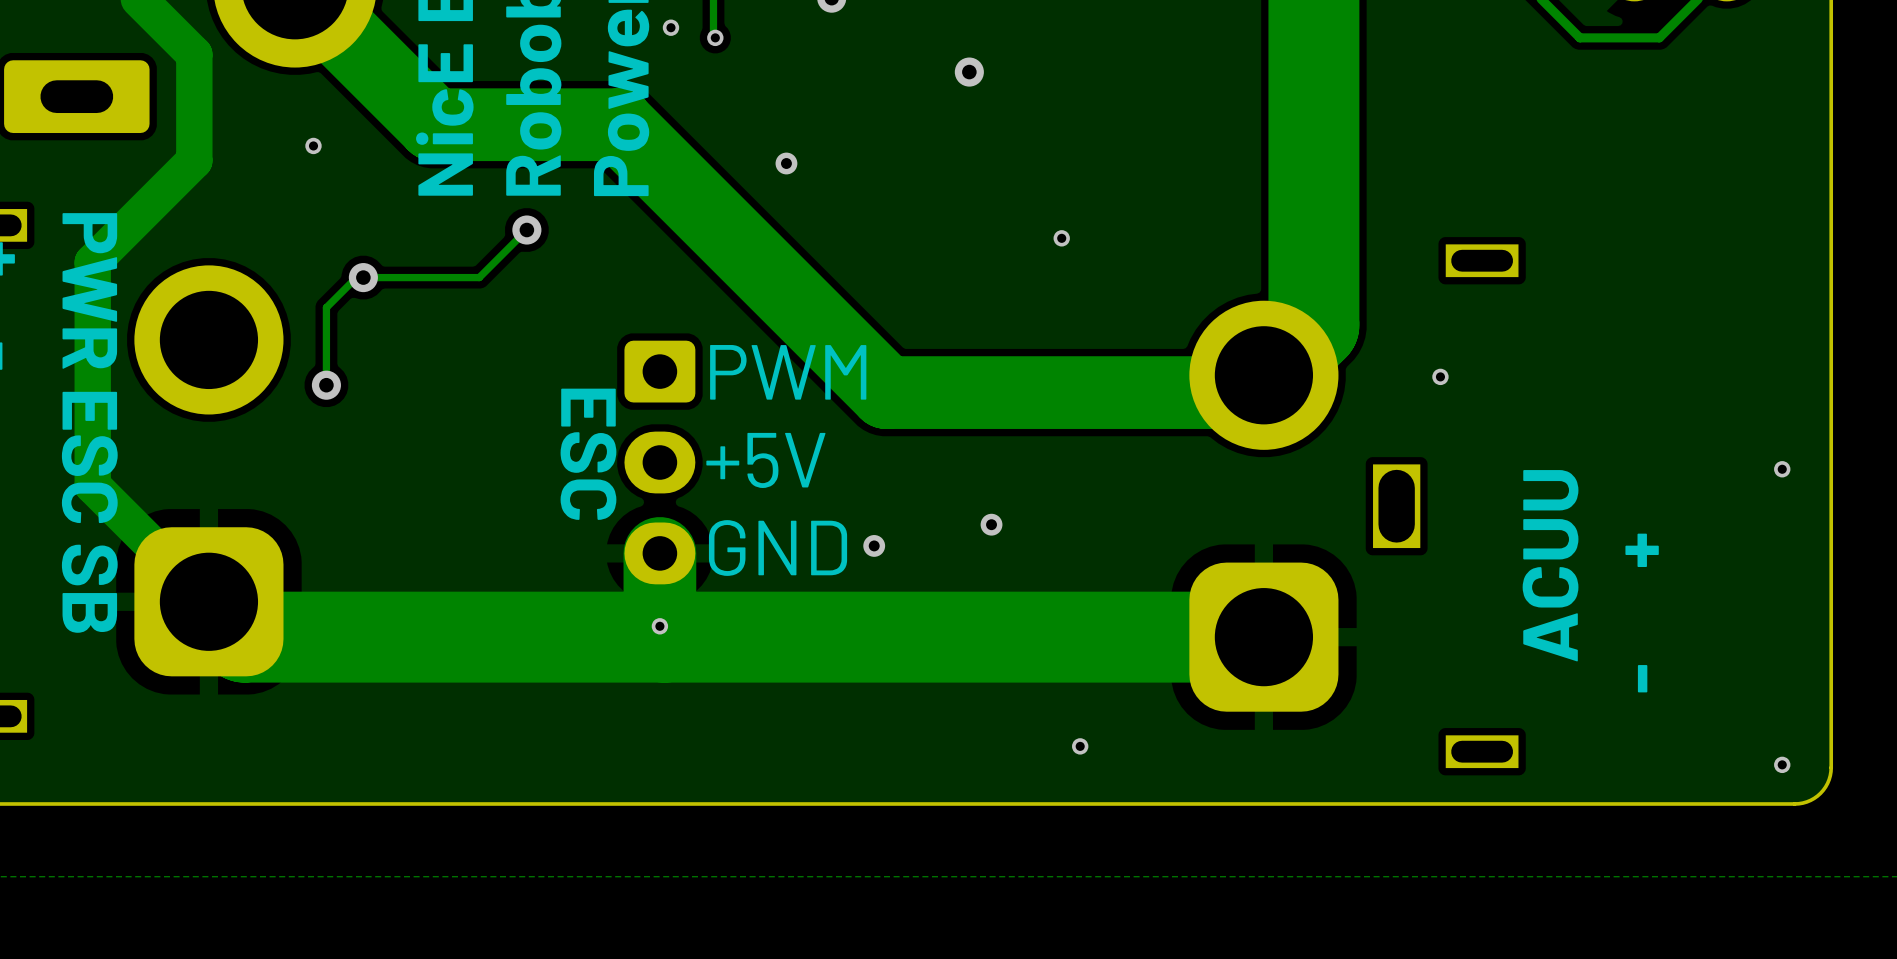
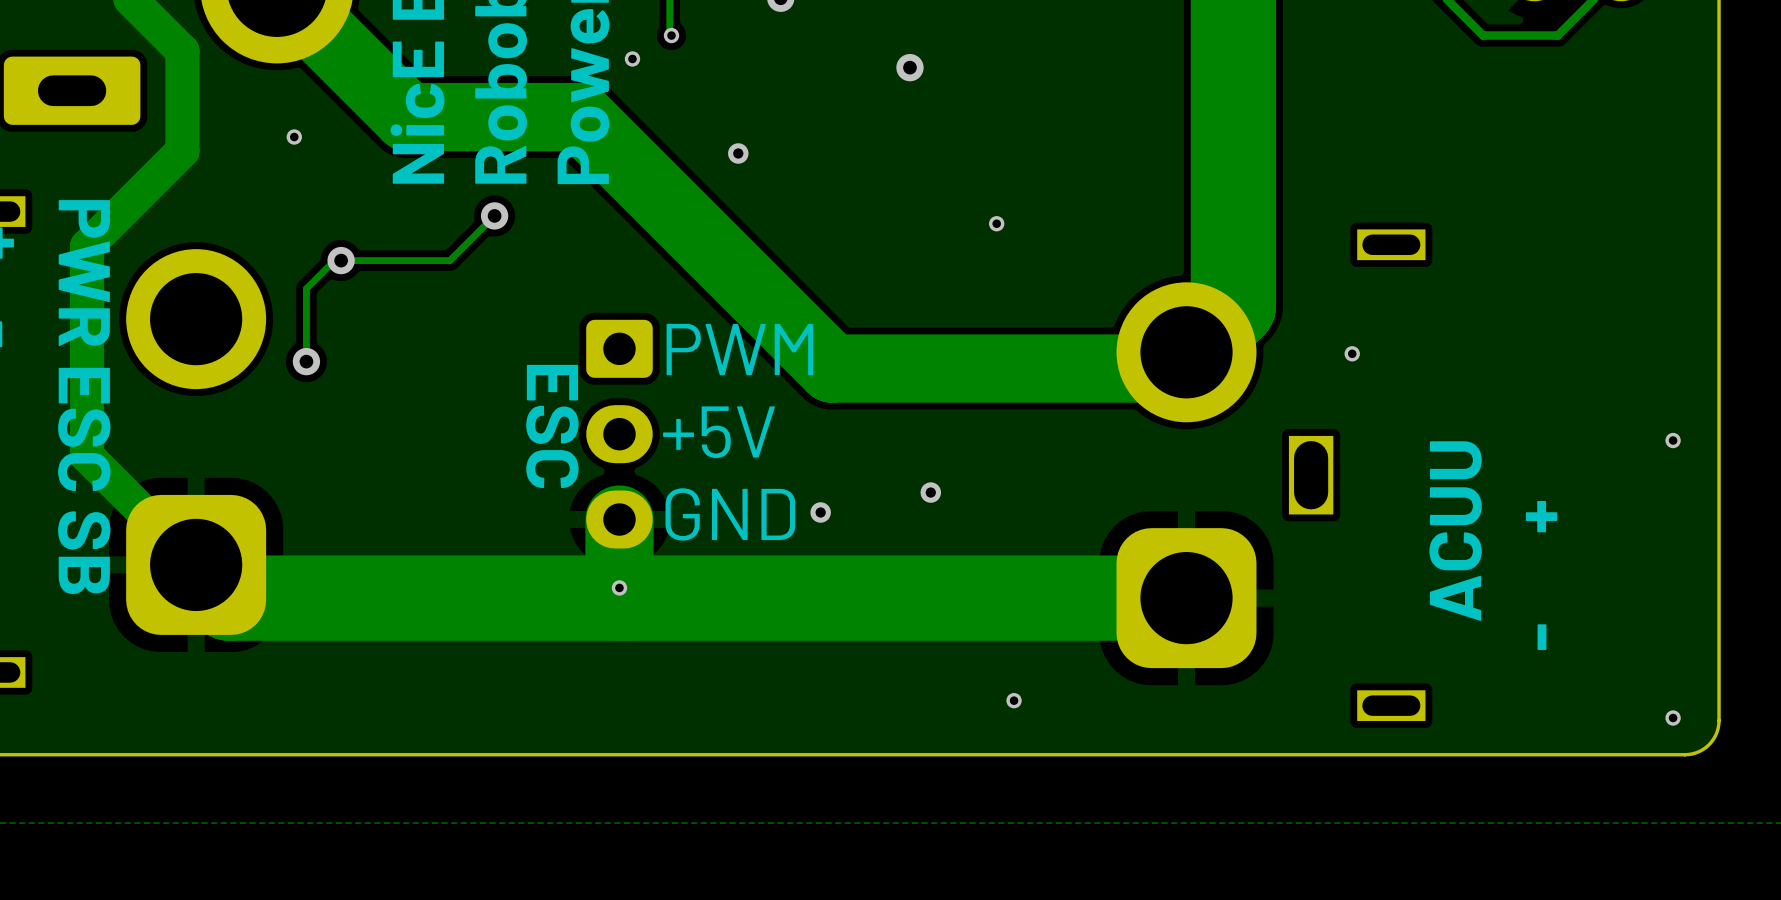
via position: (670, 27) -> (632, 58)

